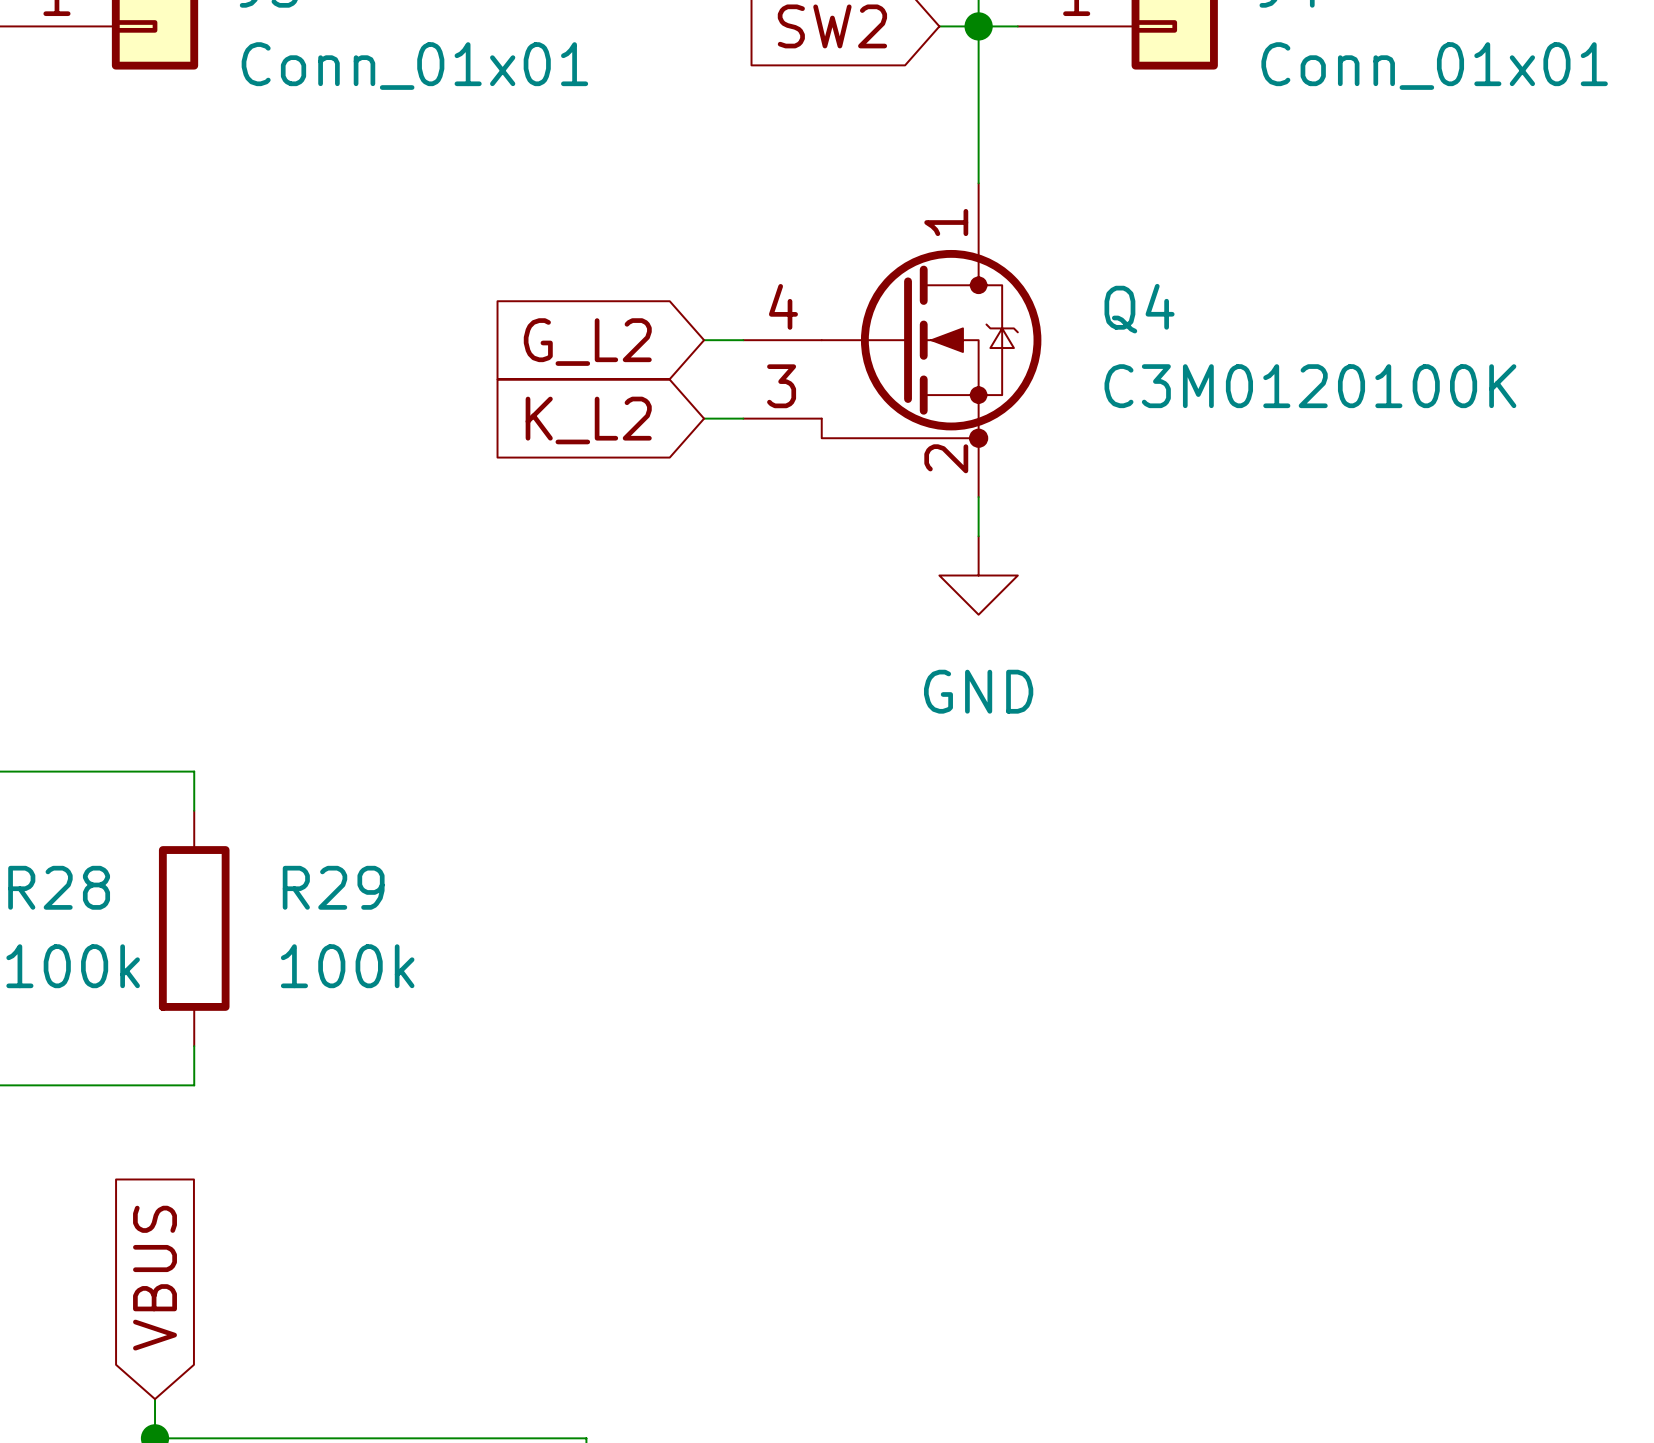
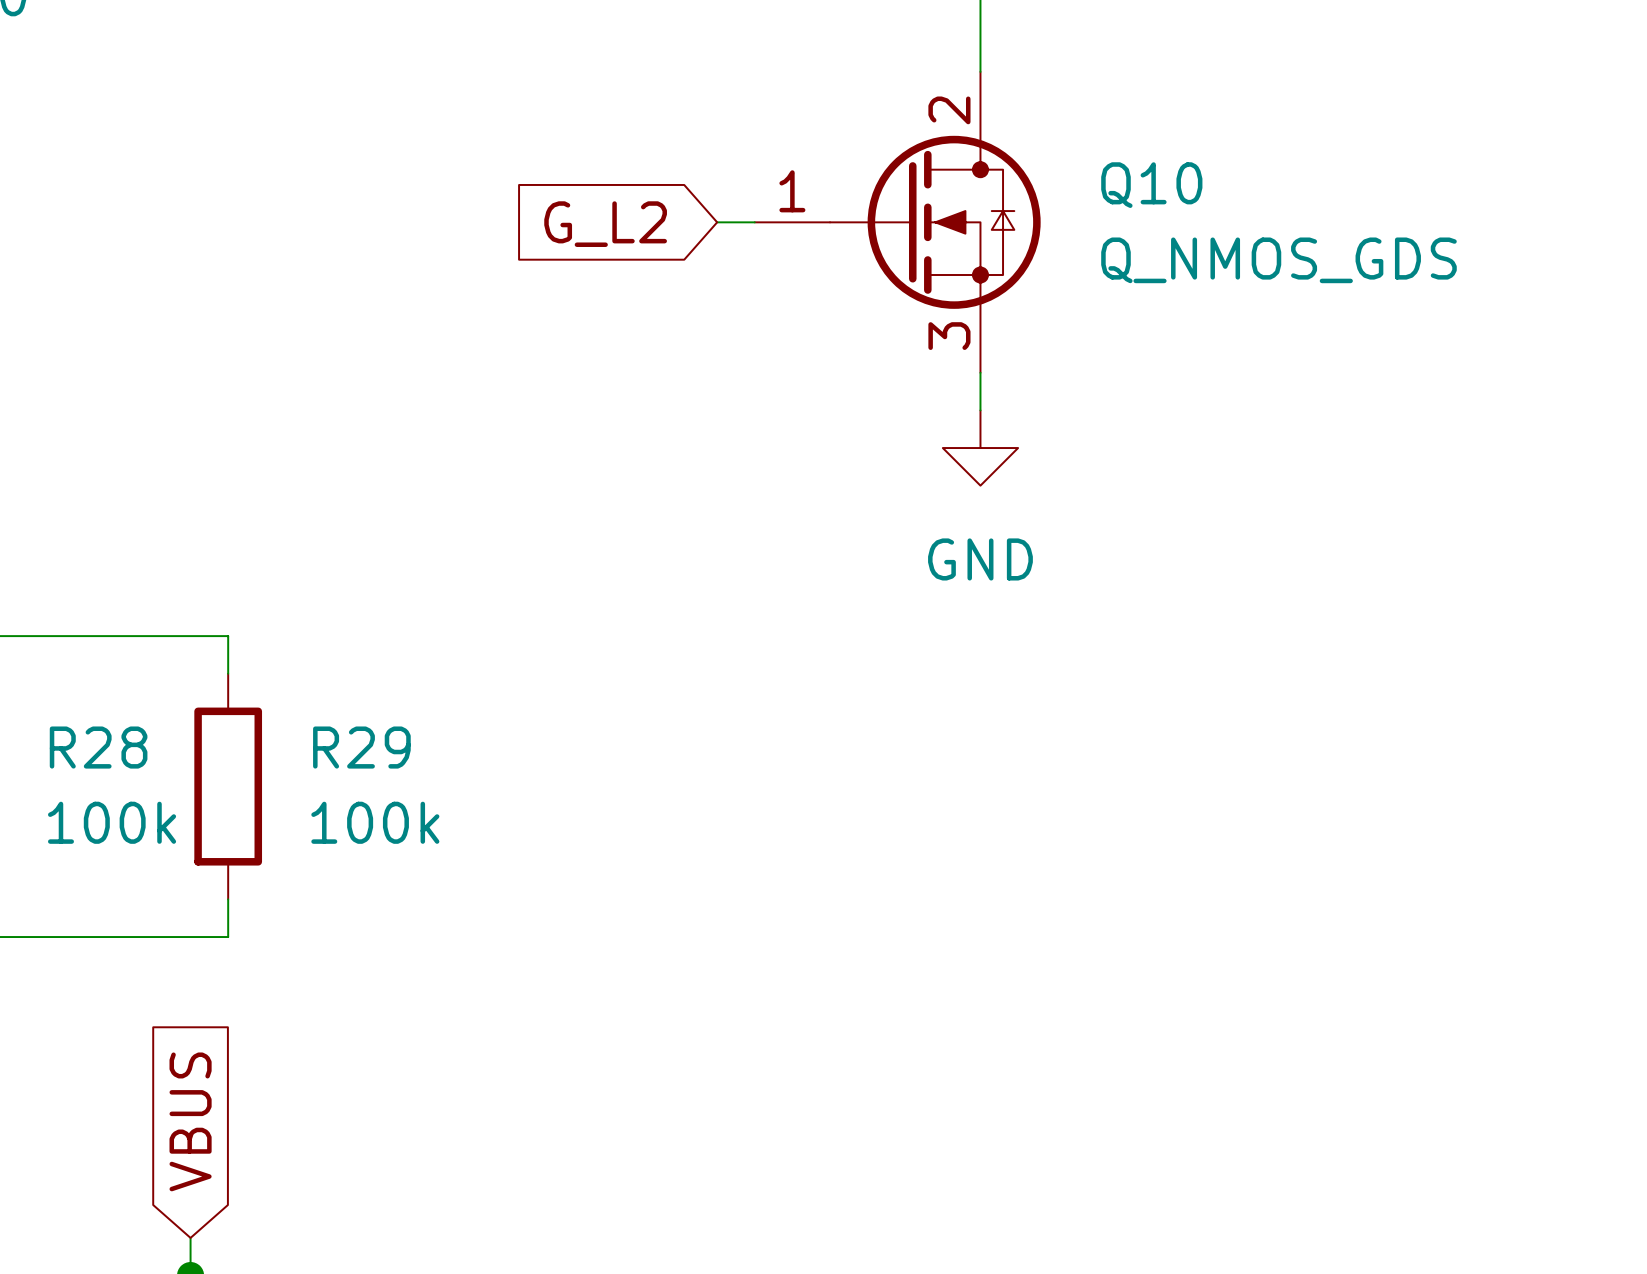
Q4: C3M0120100K (892, 340) -> none
Q10: none -> Q_NMOS_GDS (897, 222)
wire: (704, 418) (743, 418) -> none
global label: K_L2 (588, 420) -> none

